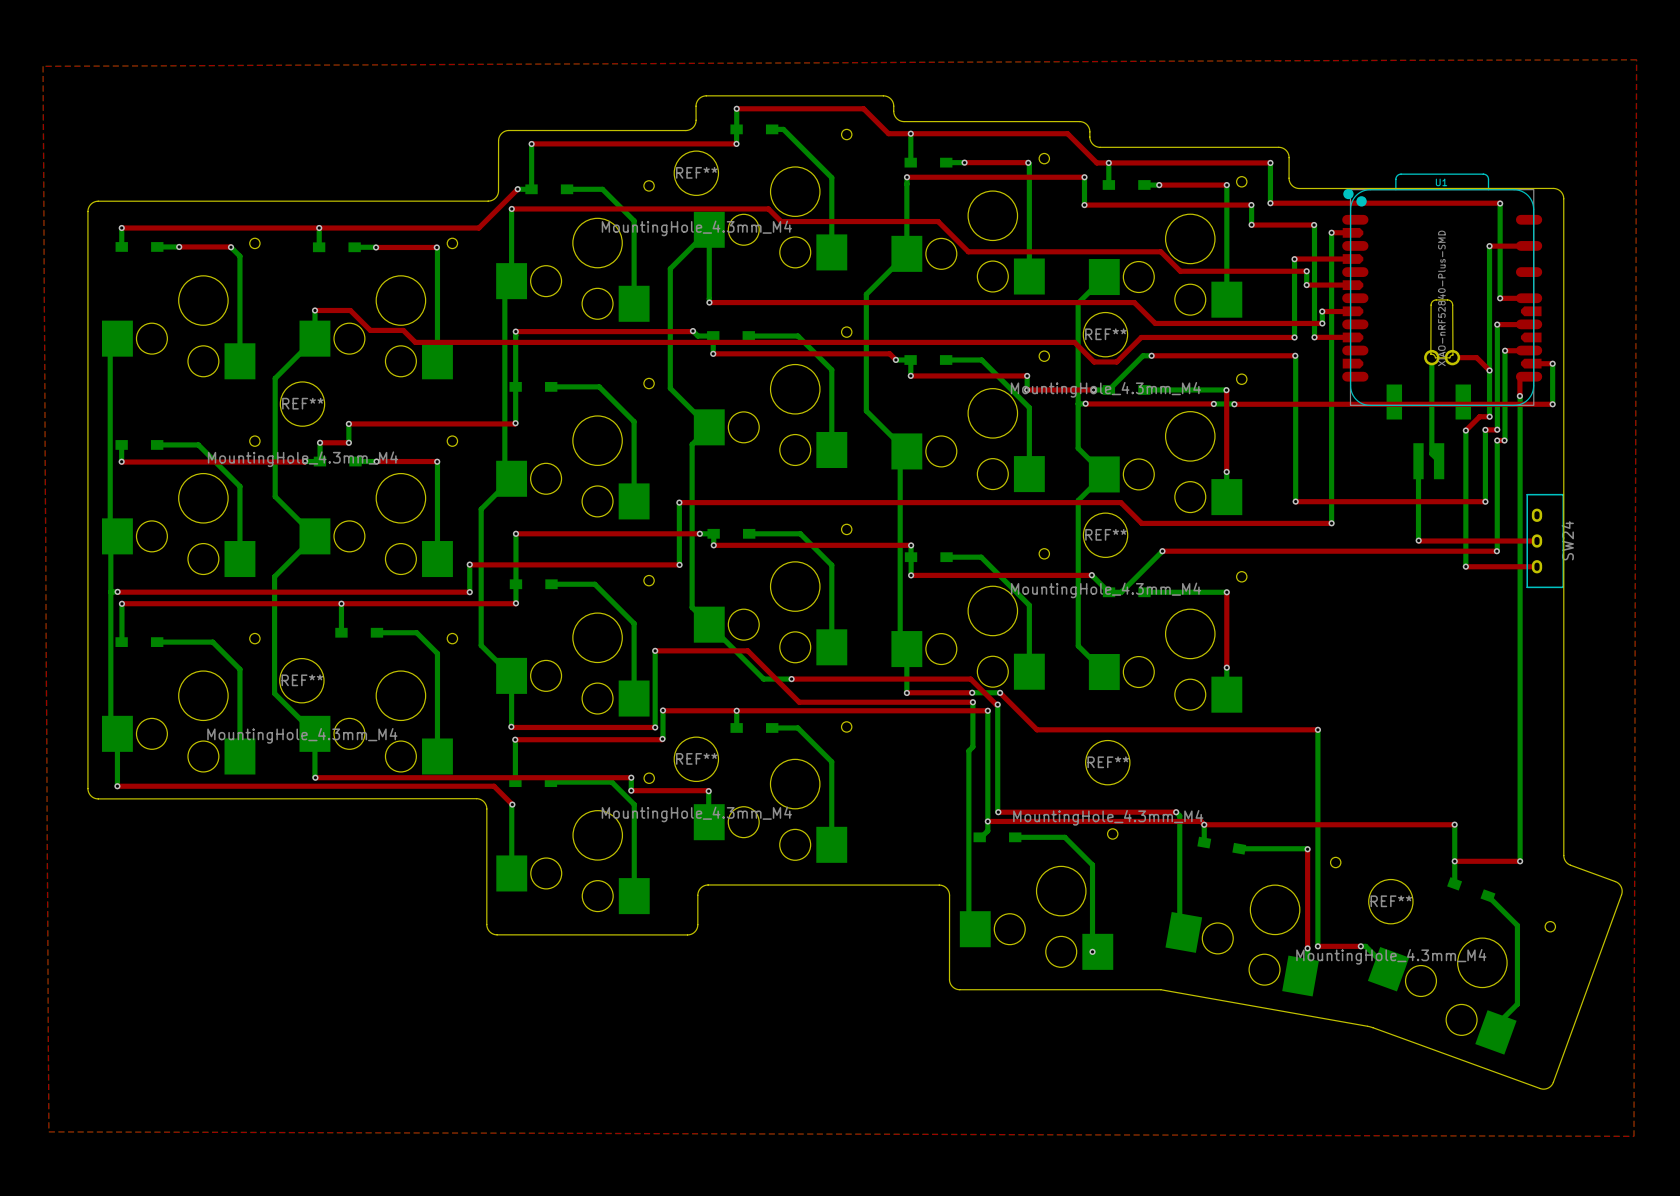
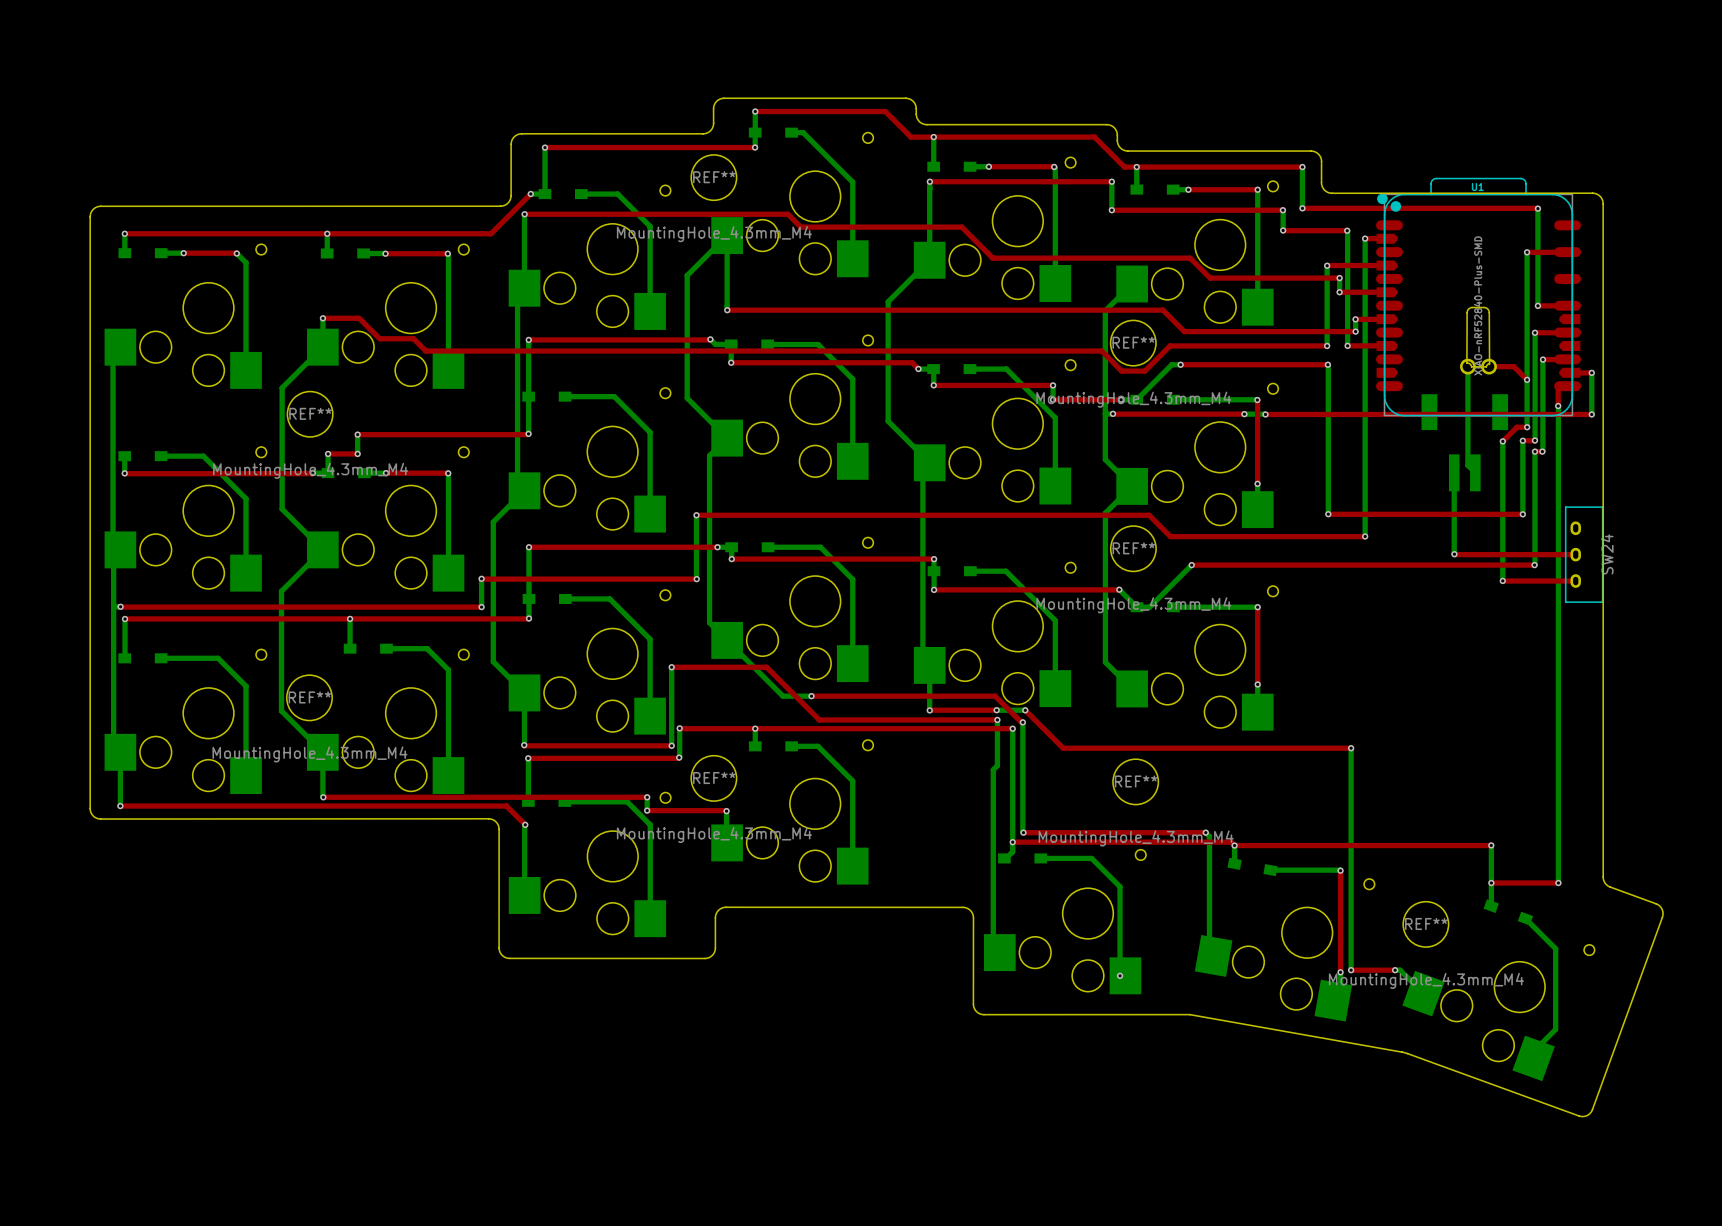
top zone outline: (1279, 60) (43, 66) (48, 1131) (1633, 1136) (1636, 59) (1279, 60) -> none

